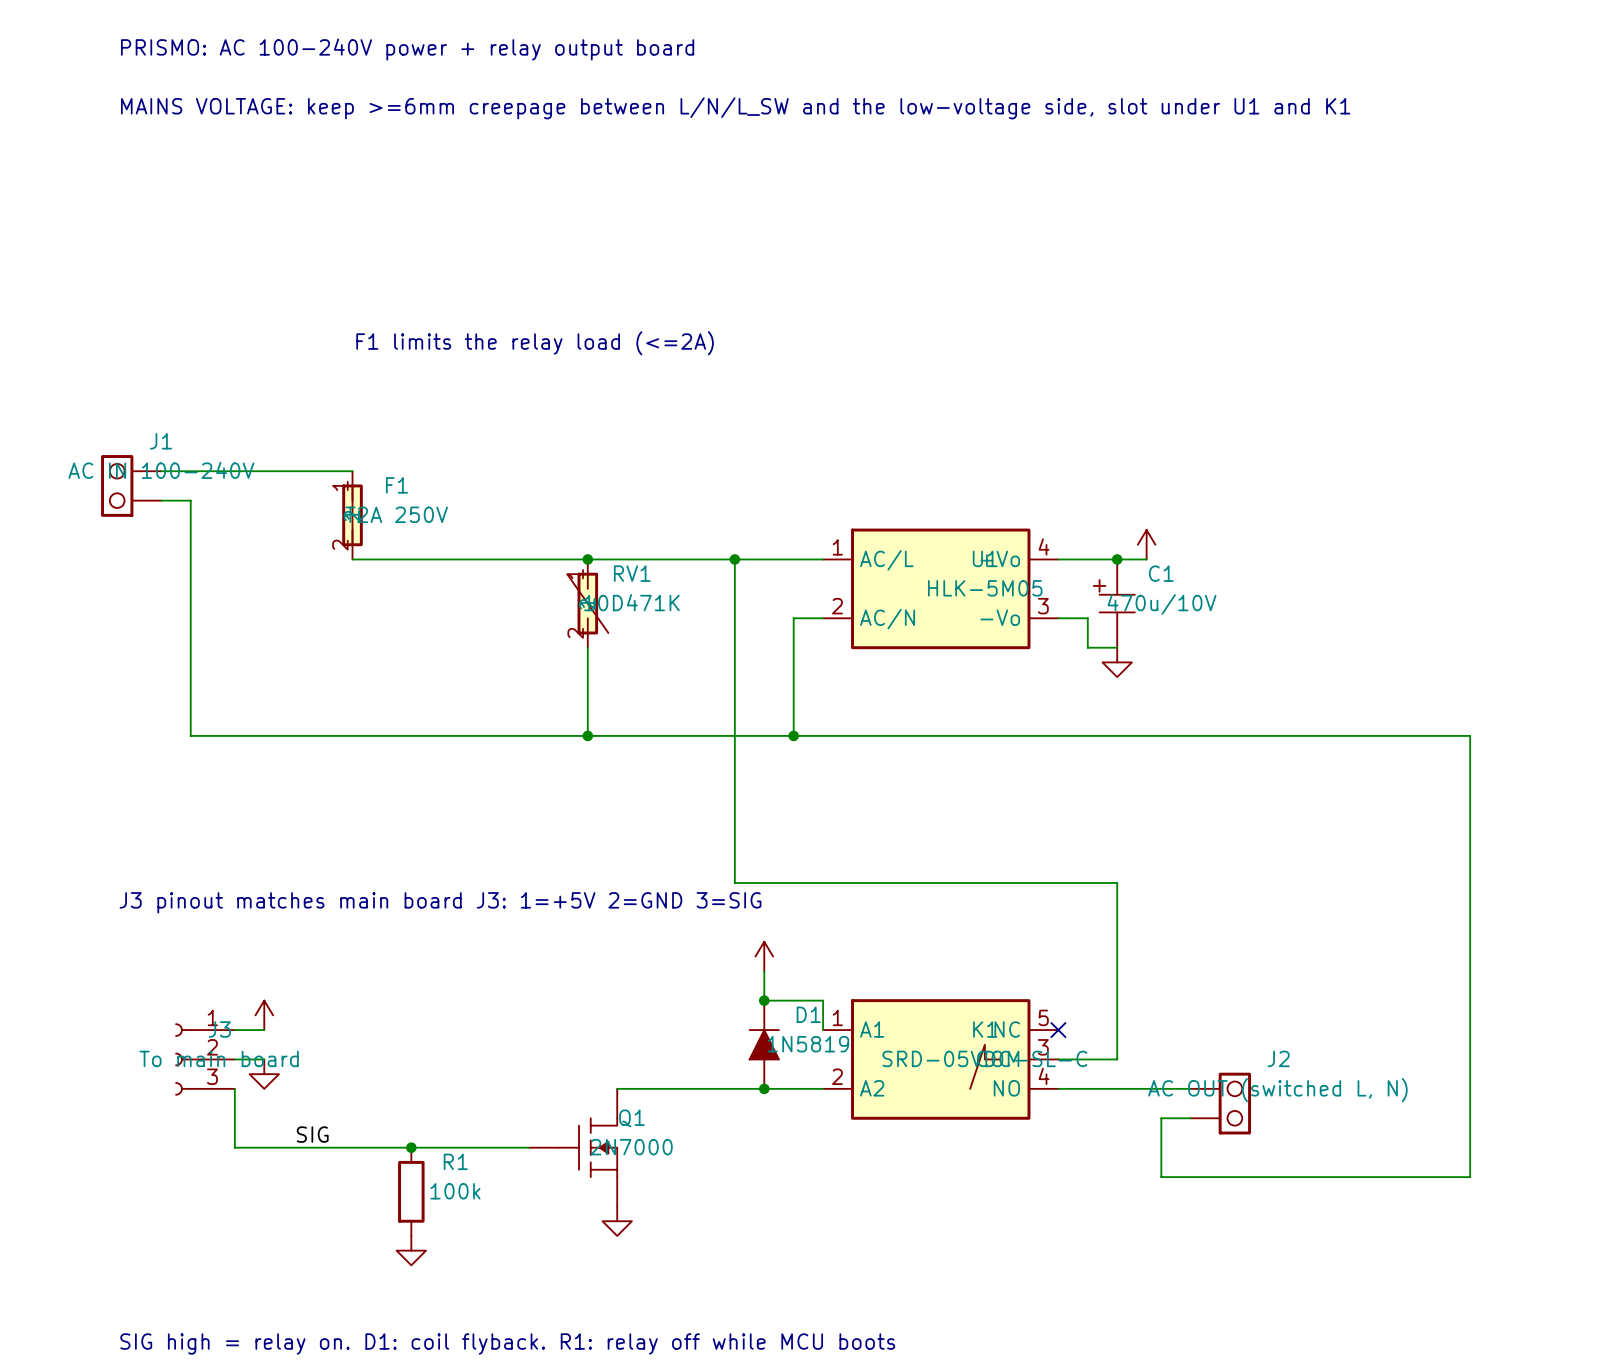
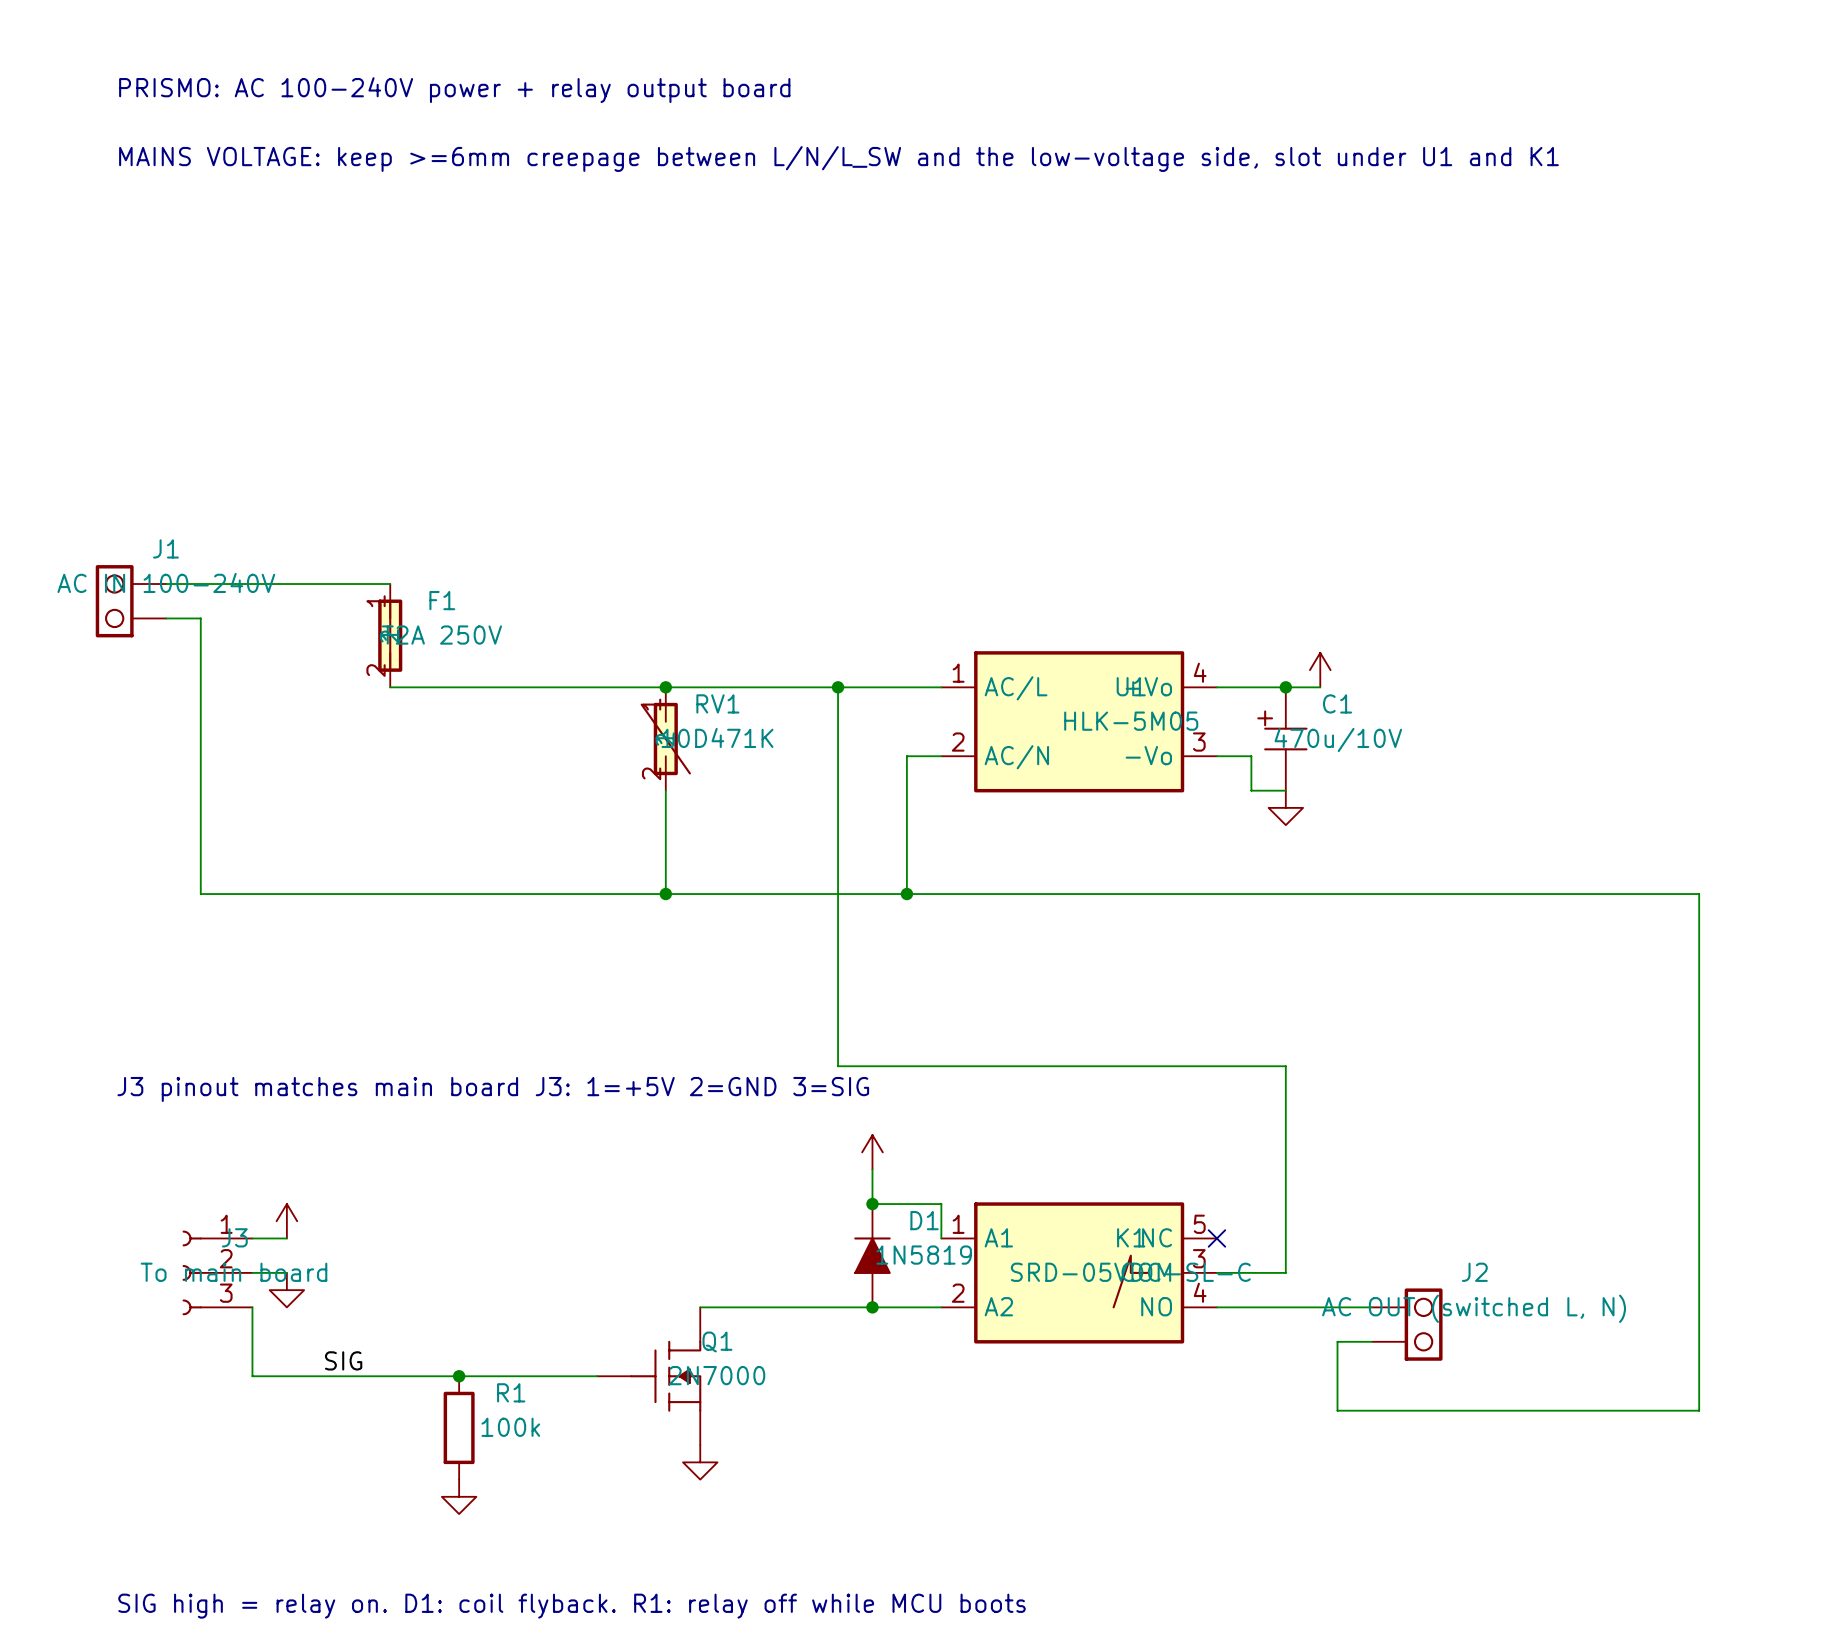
text: F1 limits the relay load (<=2A) (535, 343) -> none

